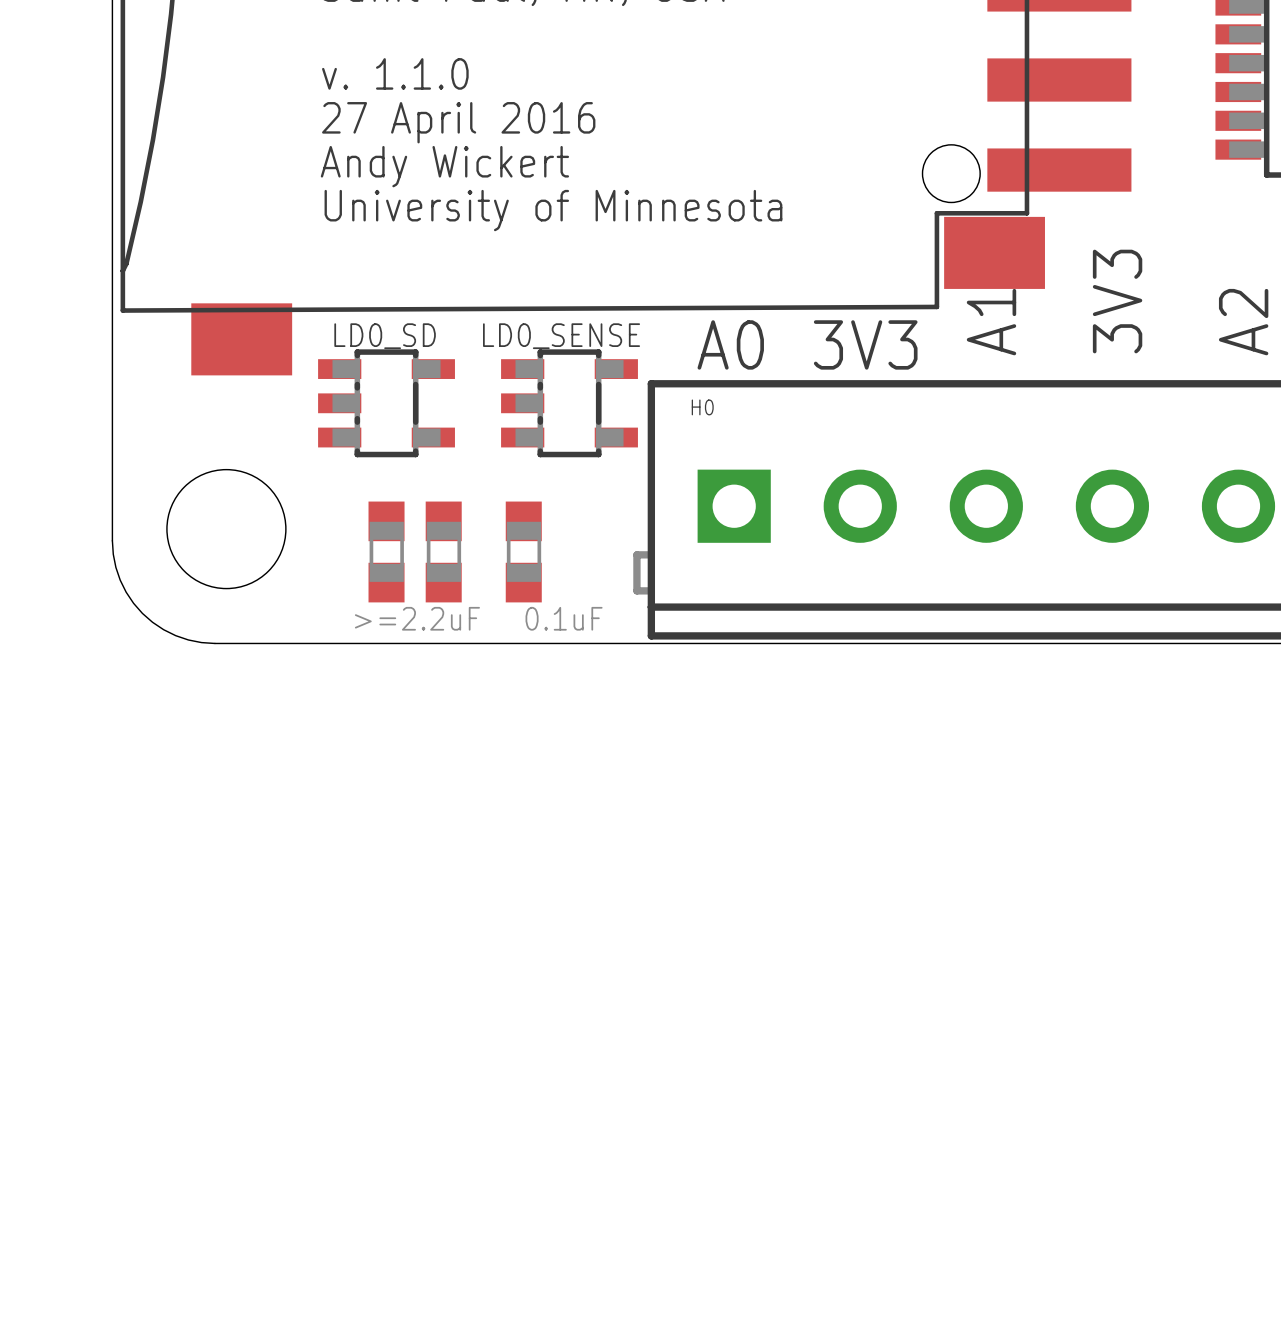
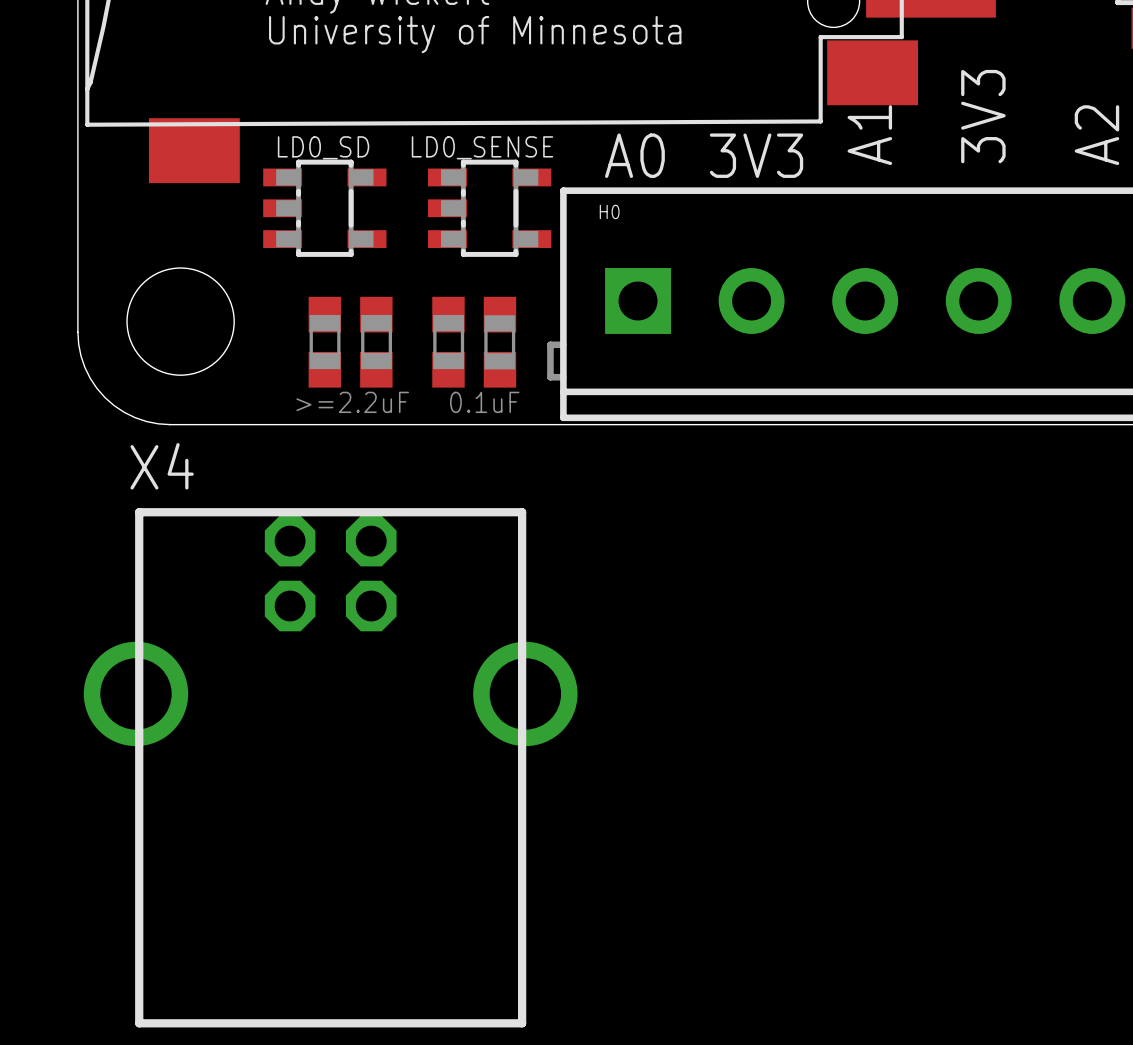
part: none -> (499, 342)
X4: none -> (330, 767)

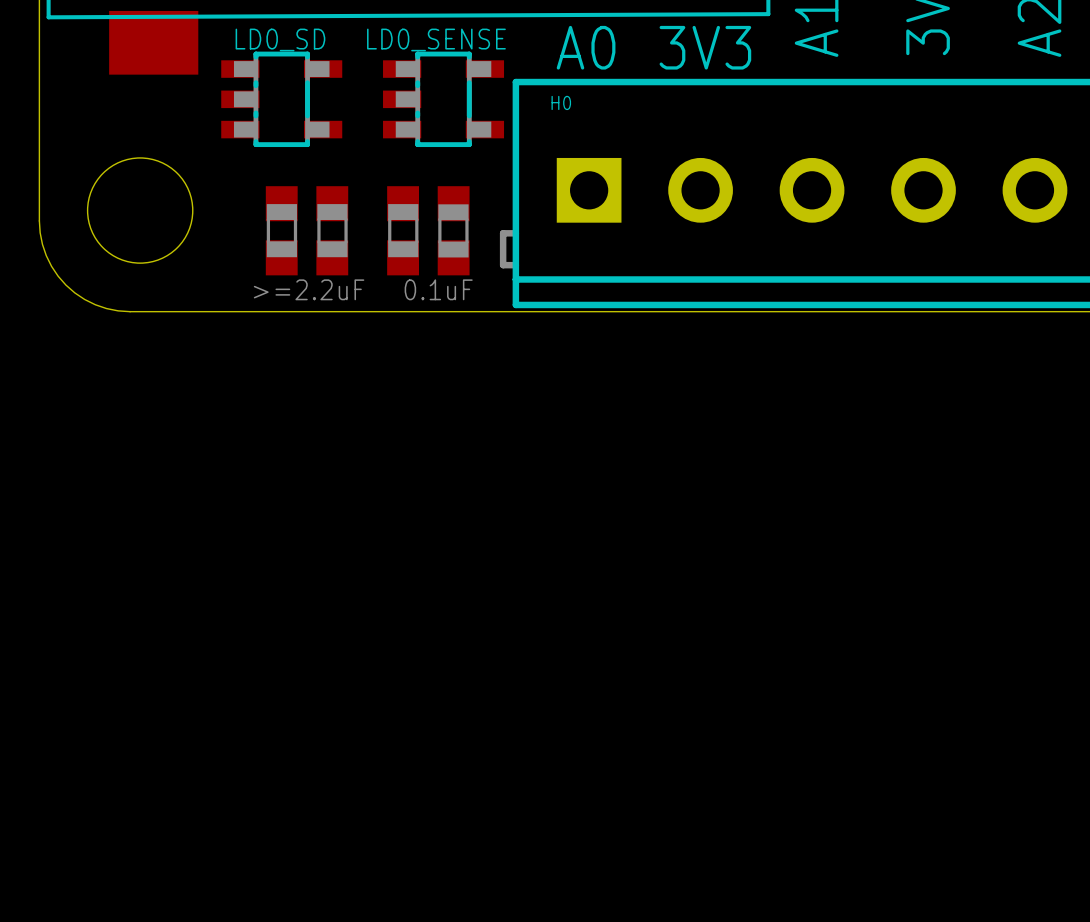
X4: (330, 767) -> none

